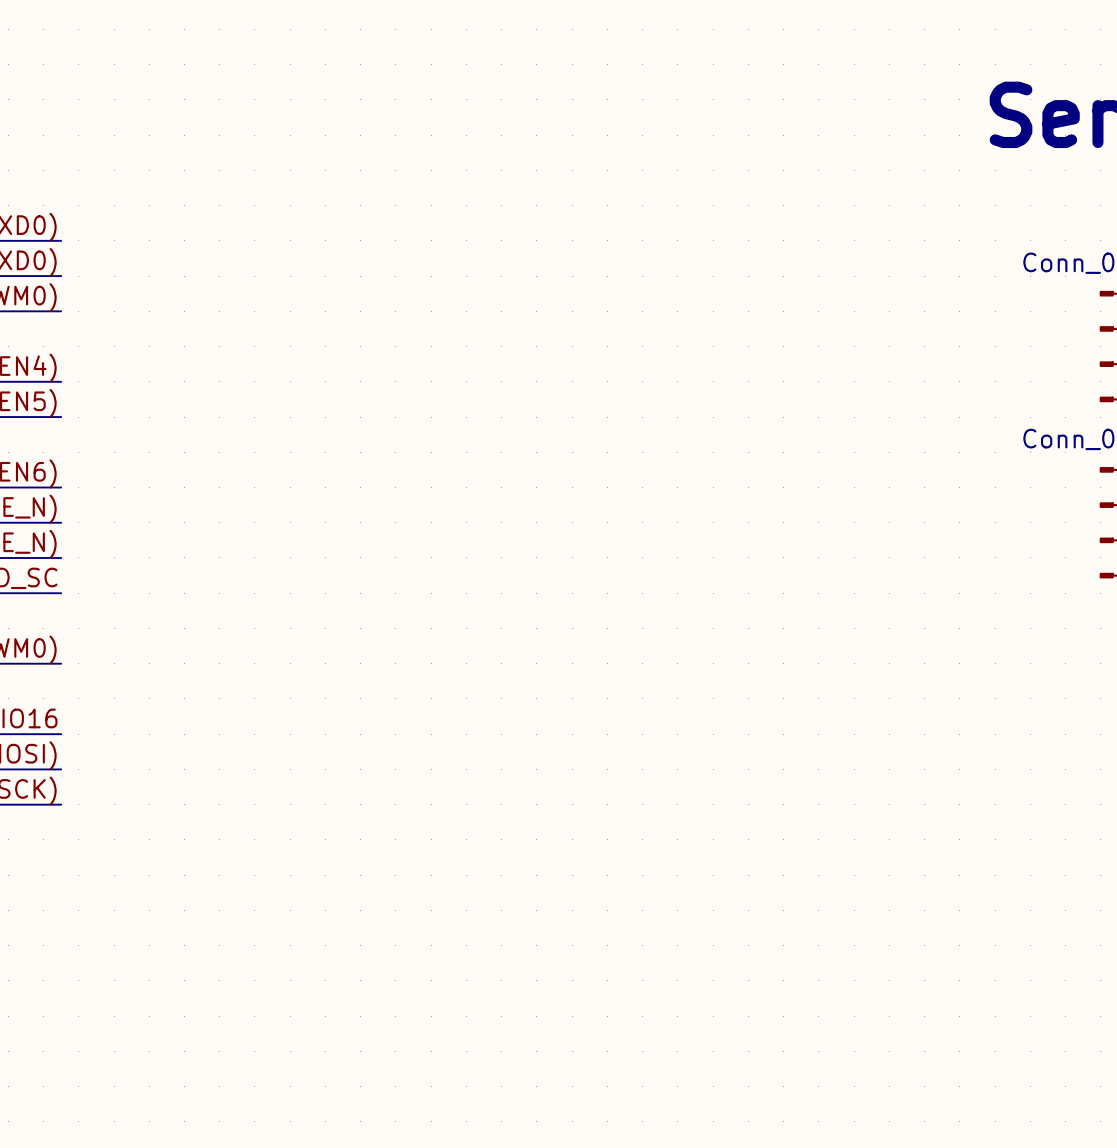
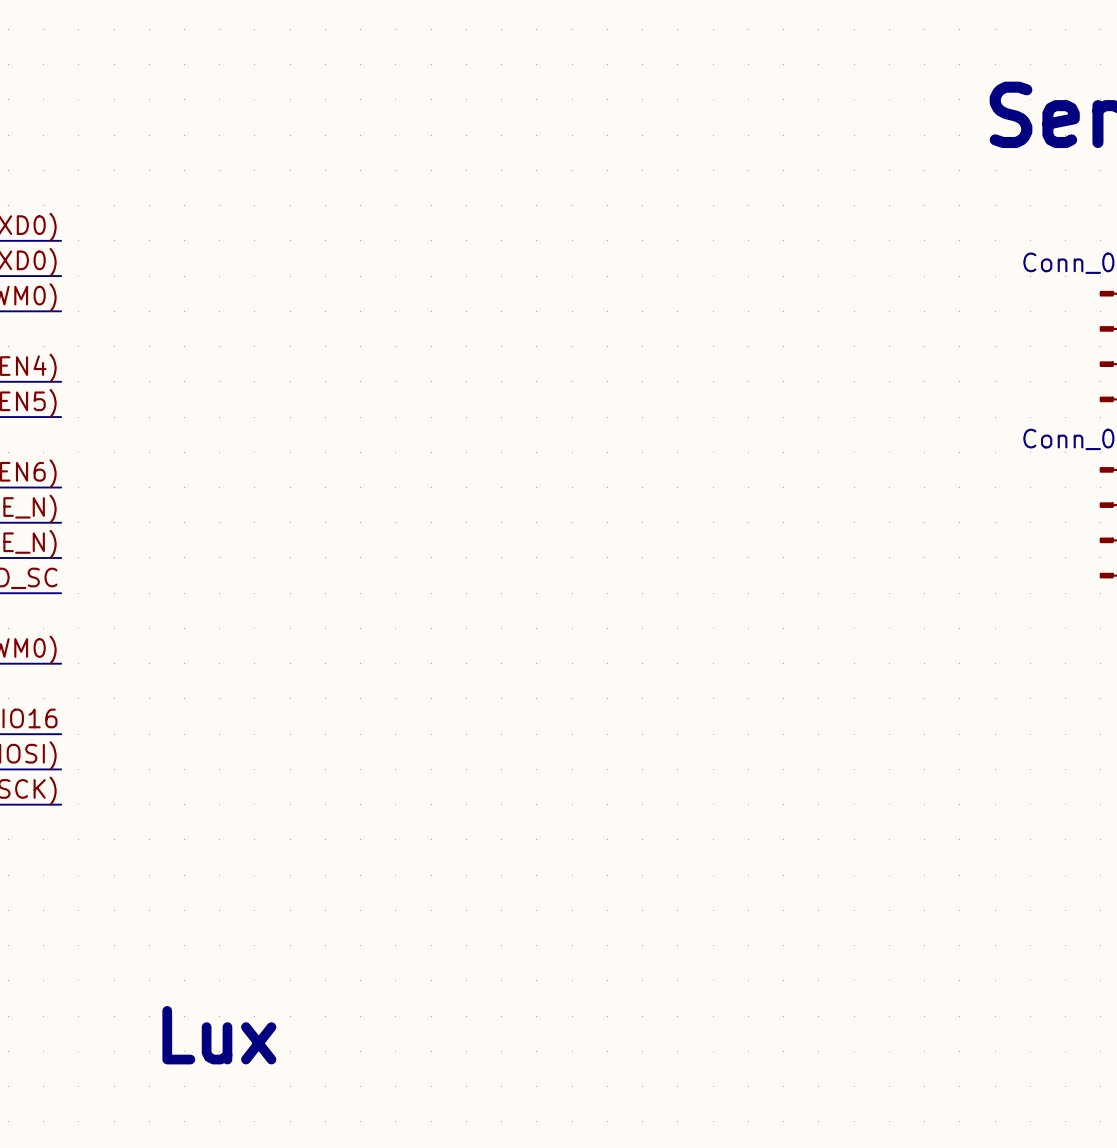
text: none -> Lux (219, 1035)

